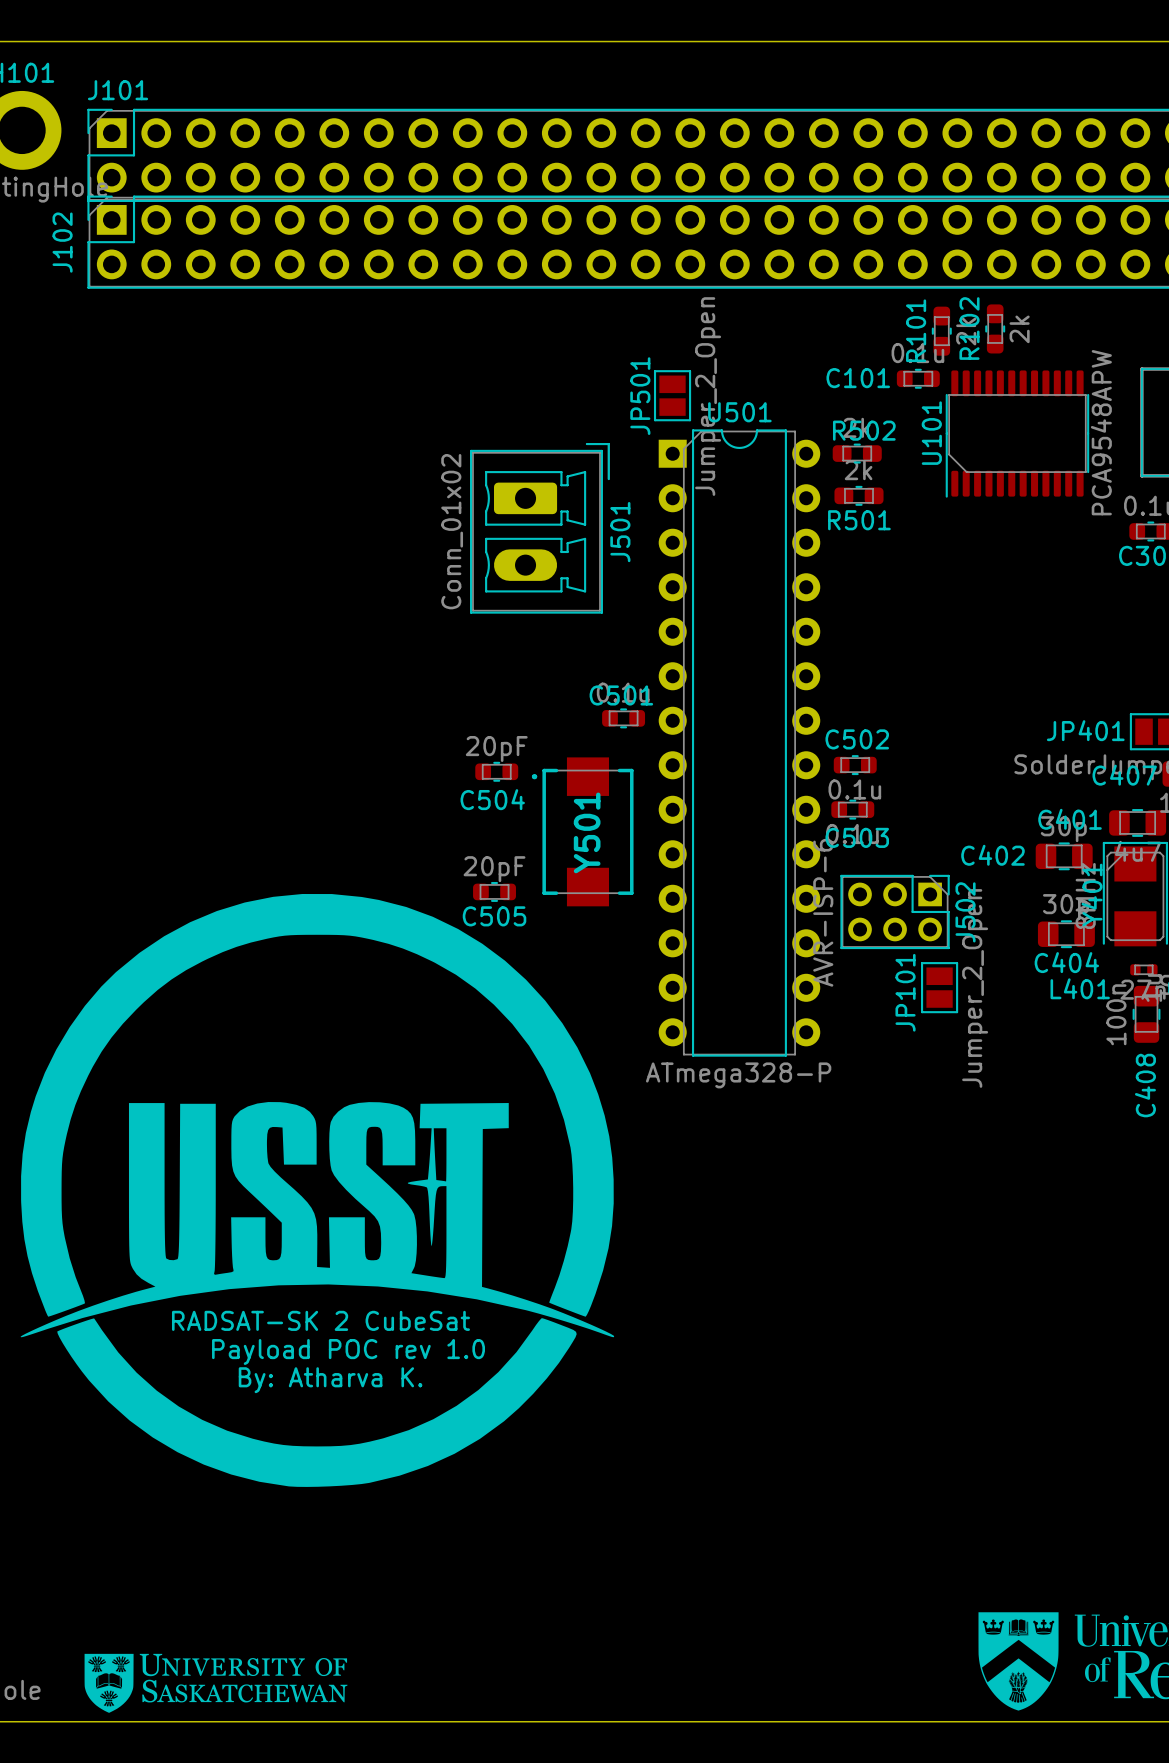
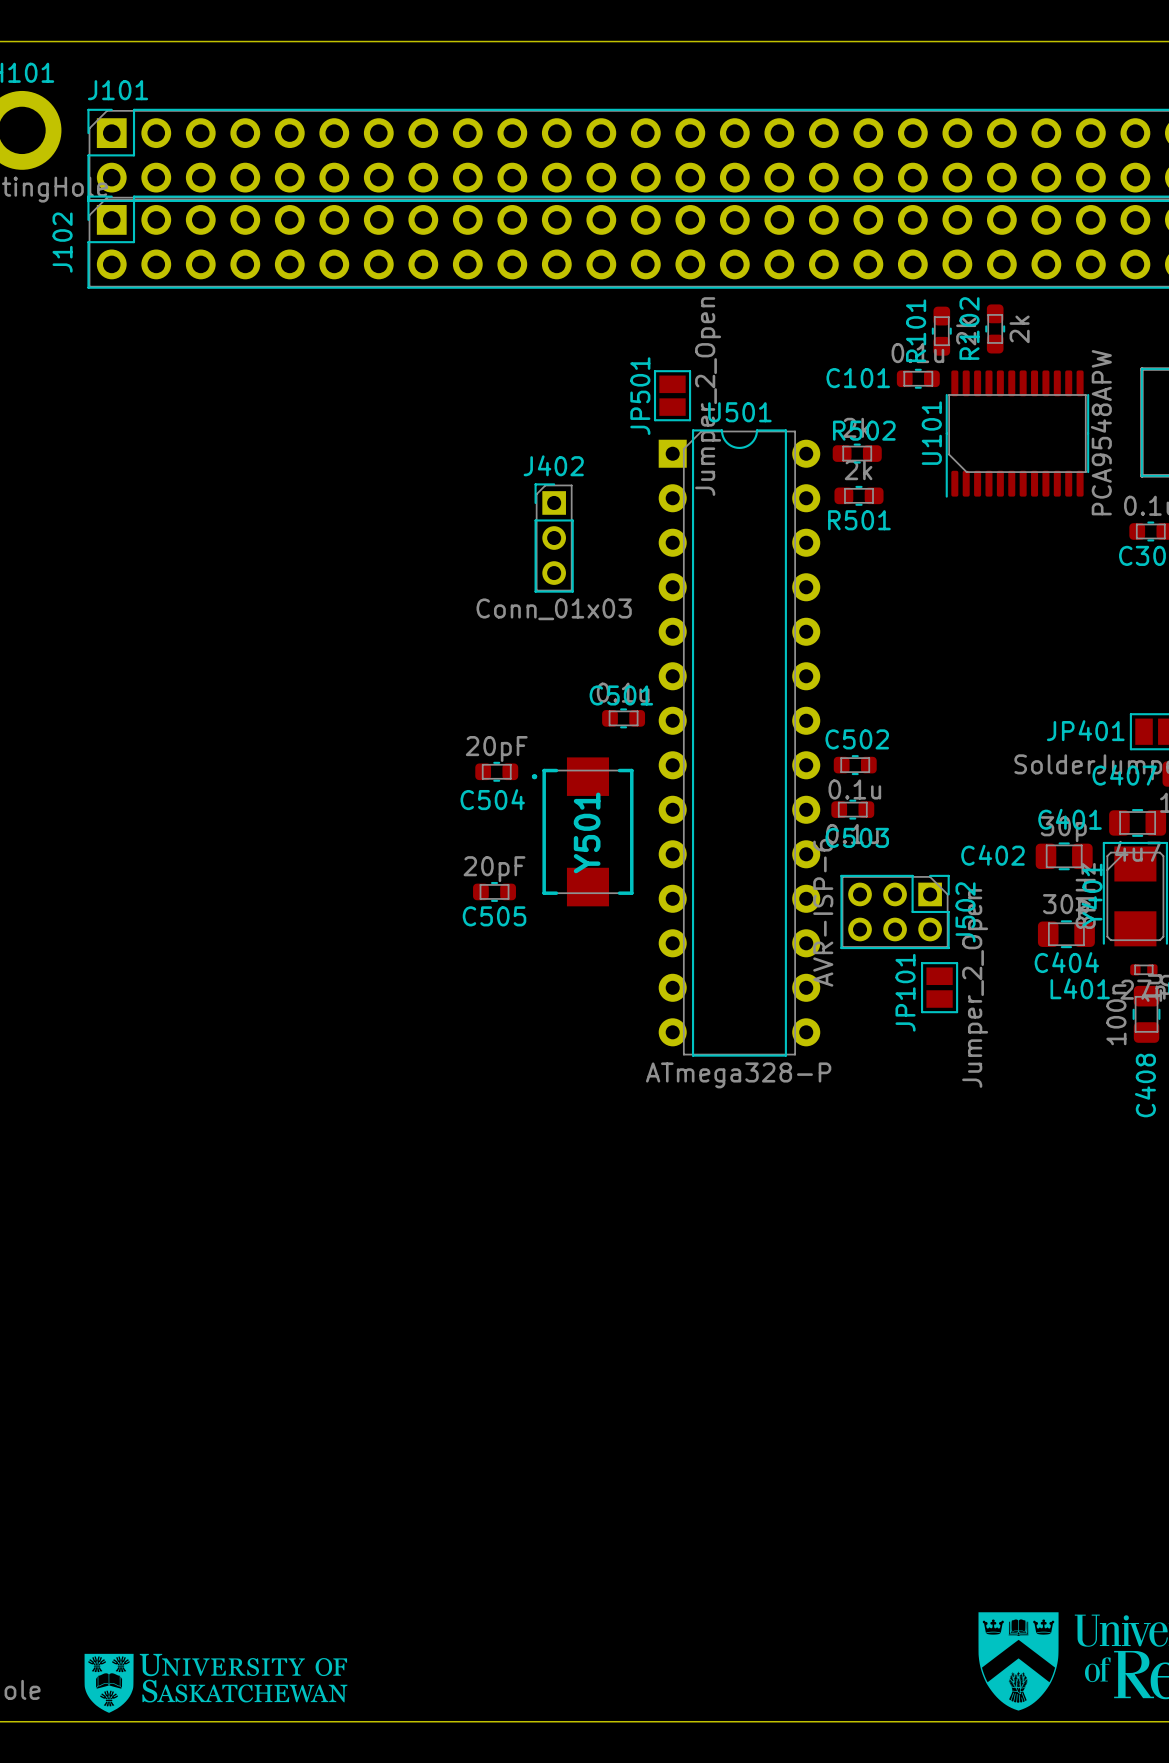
J501: Conn_01x02 (539, 528) -> none
J402: none -> Conn_01x03 (554, 538)
drawing: [20, 894, 615, 1487] -> none
text: RADSAT-SK 2 CubeSat (320, 1320) -> none
text: Payload POC rev 1.0 (348, 1351) -> none
text: By: Atharva K. (330, 1380) -> none

